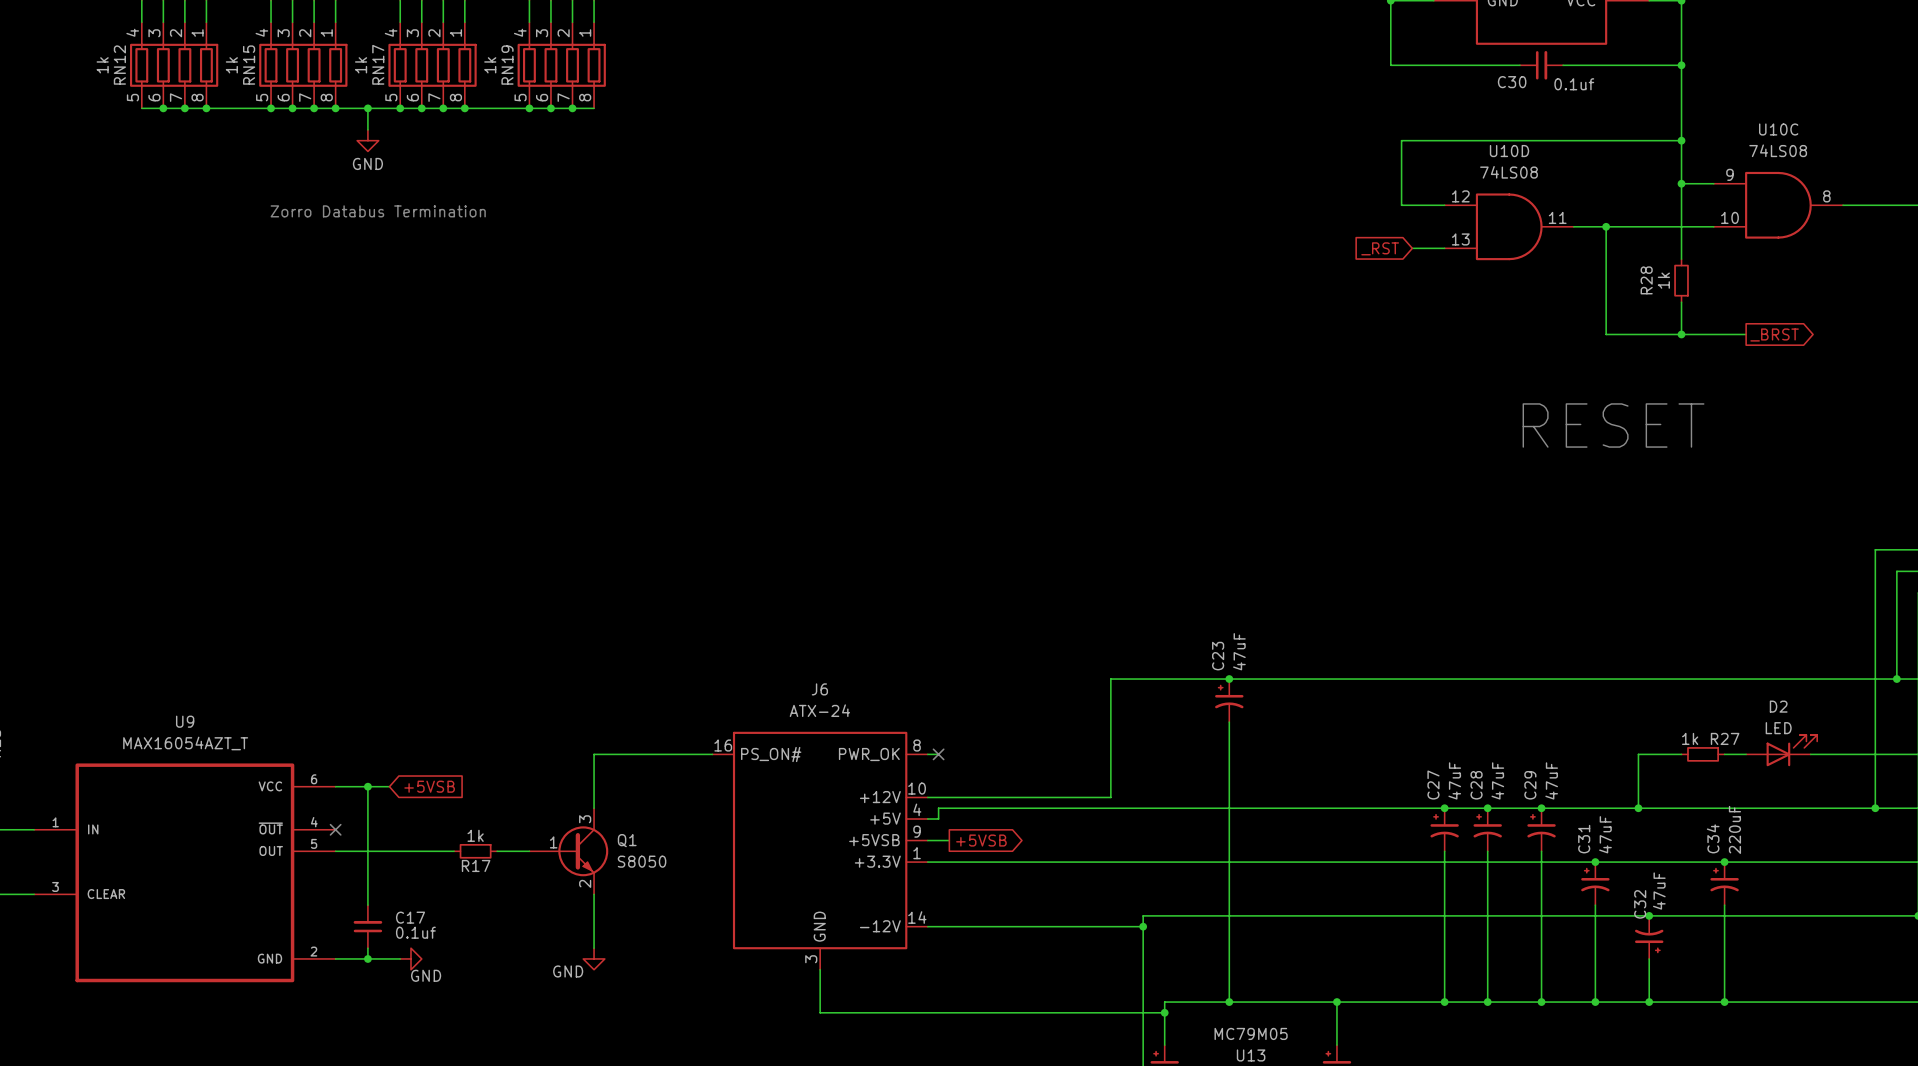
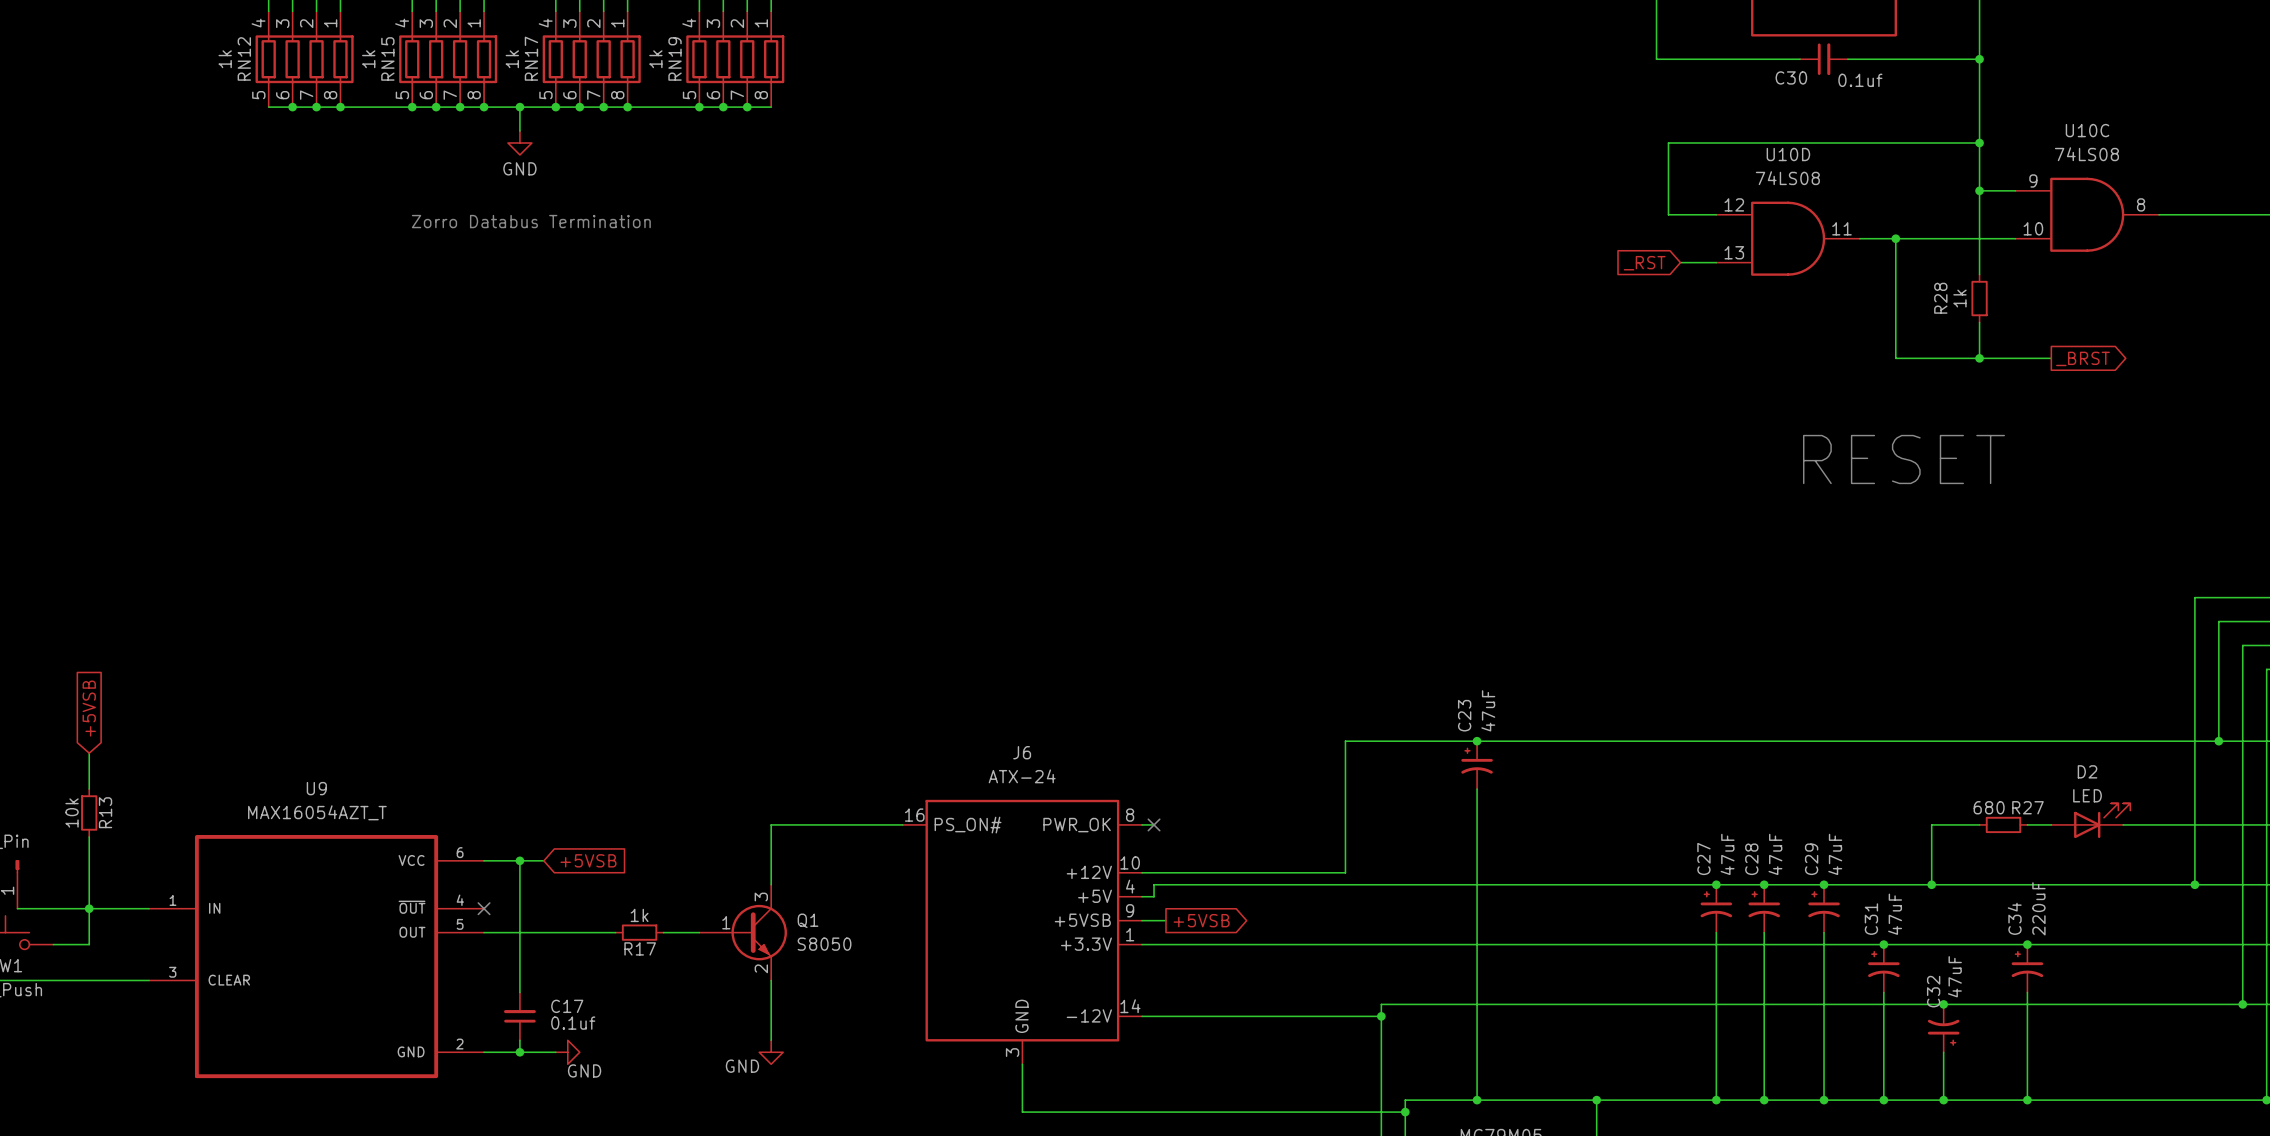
R27 value: 1k (1690, 738) -> 680 (1989, 807)

